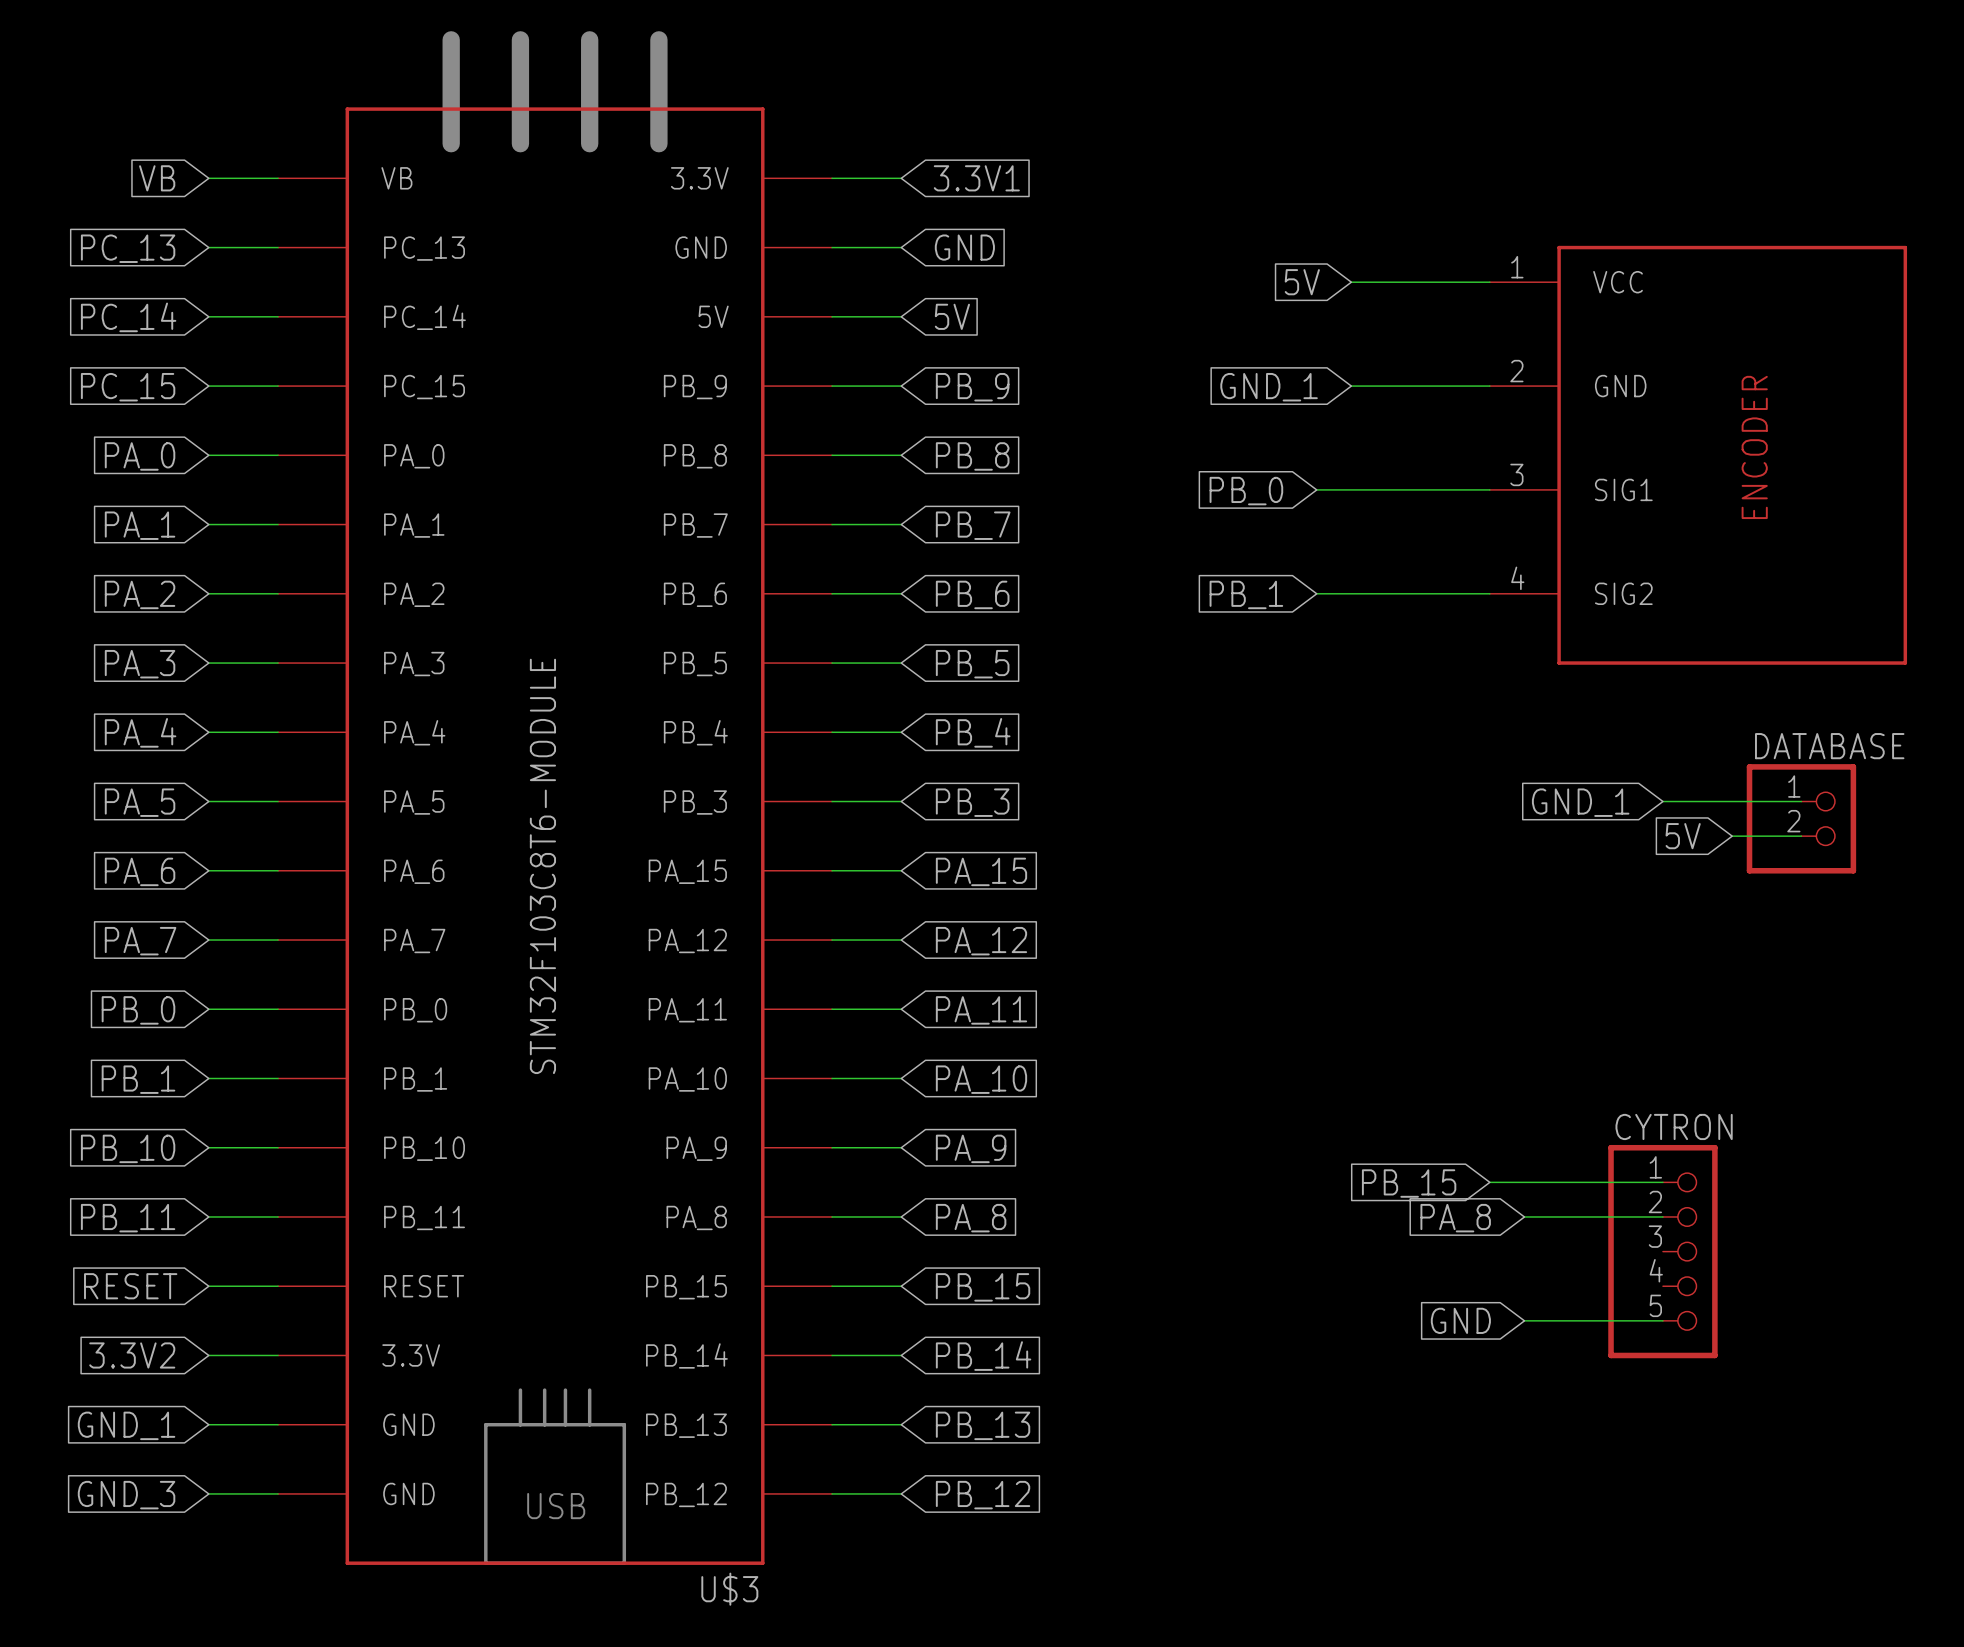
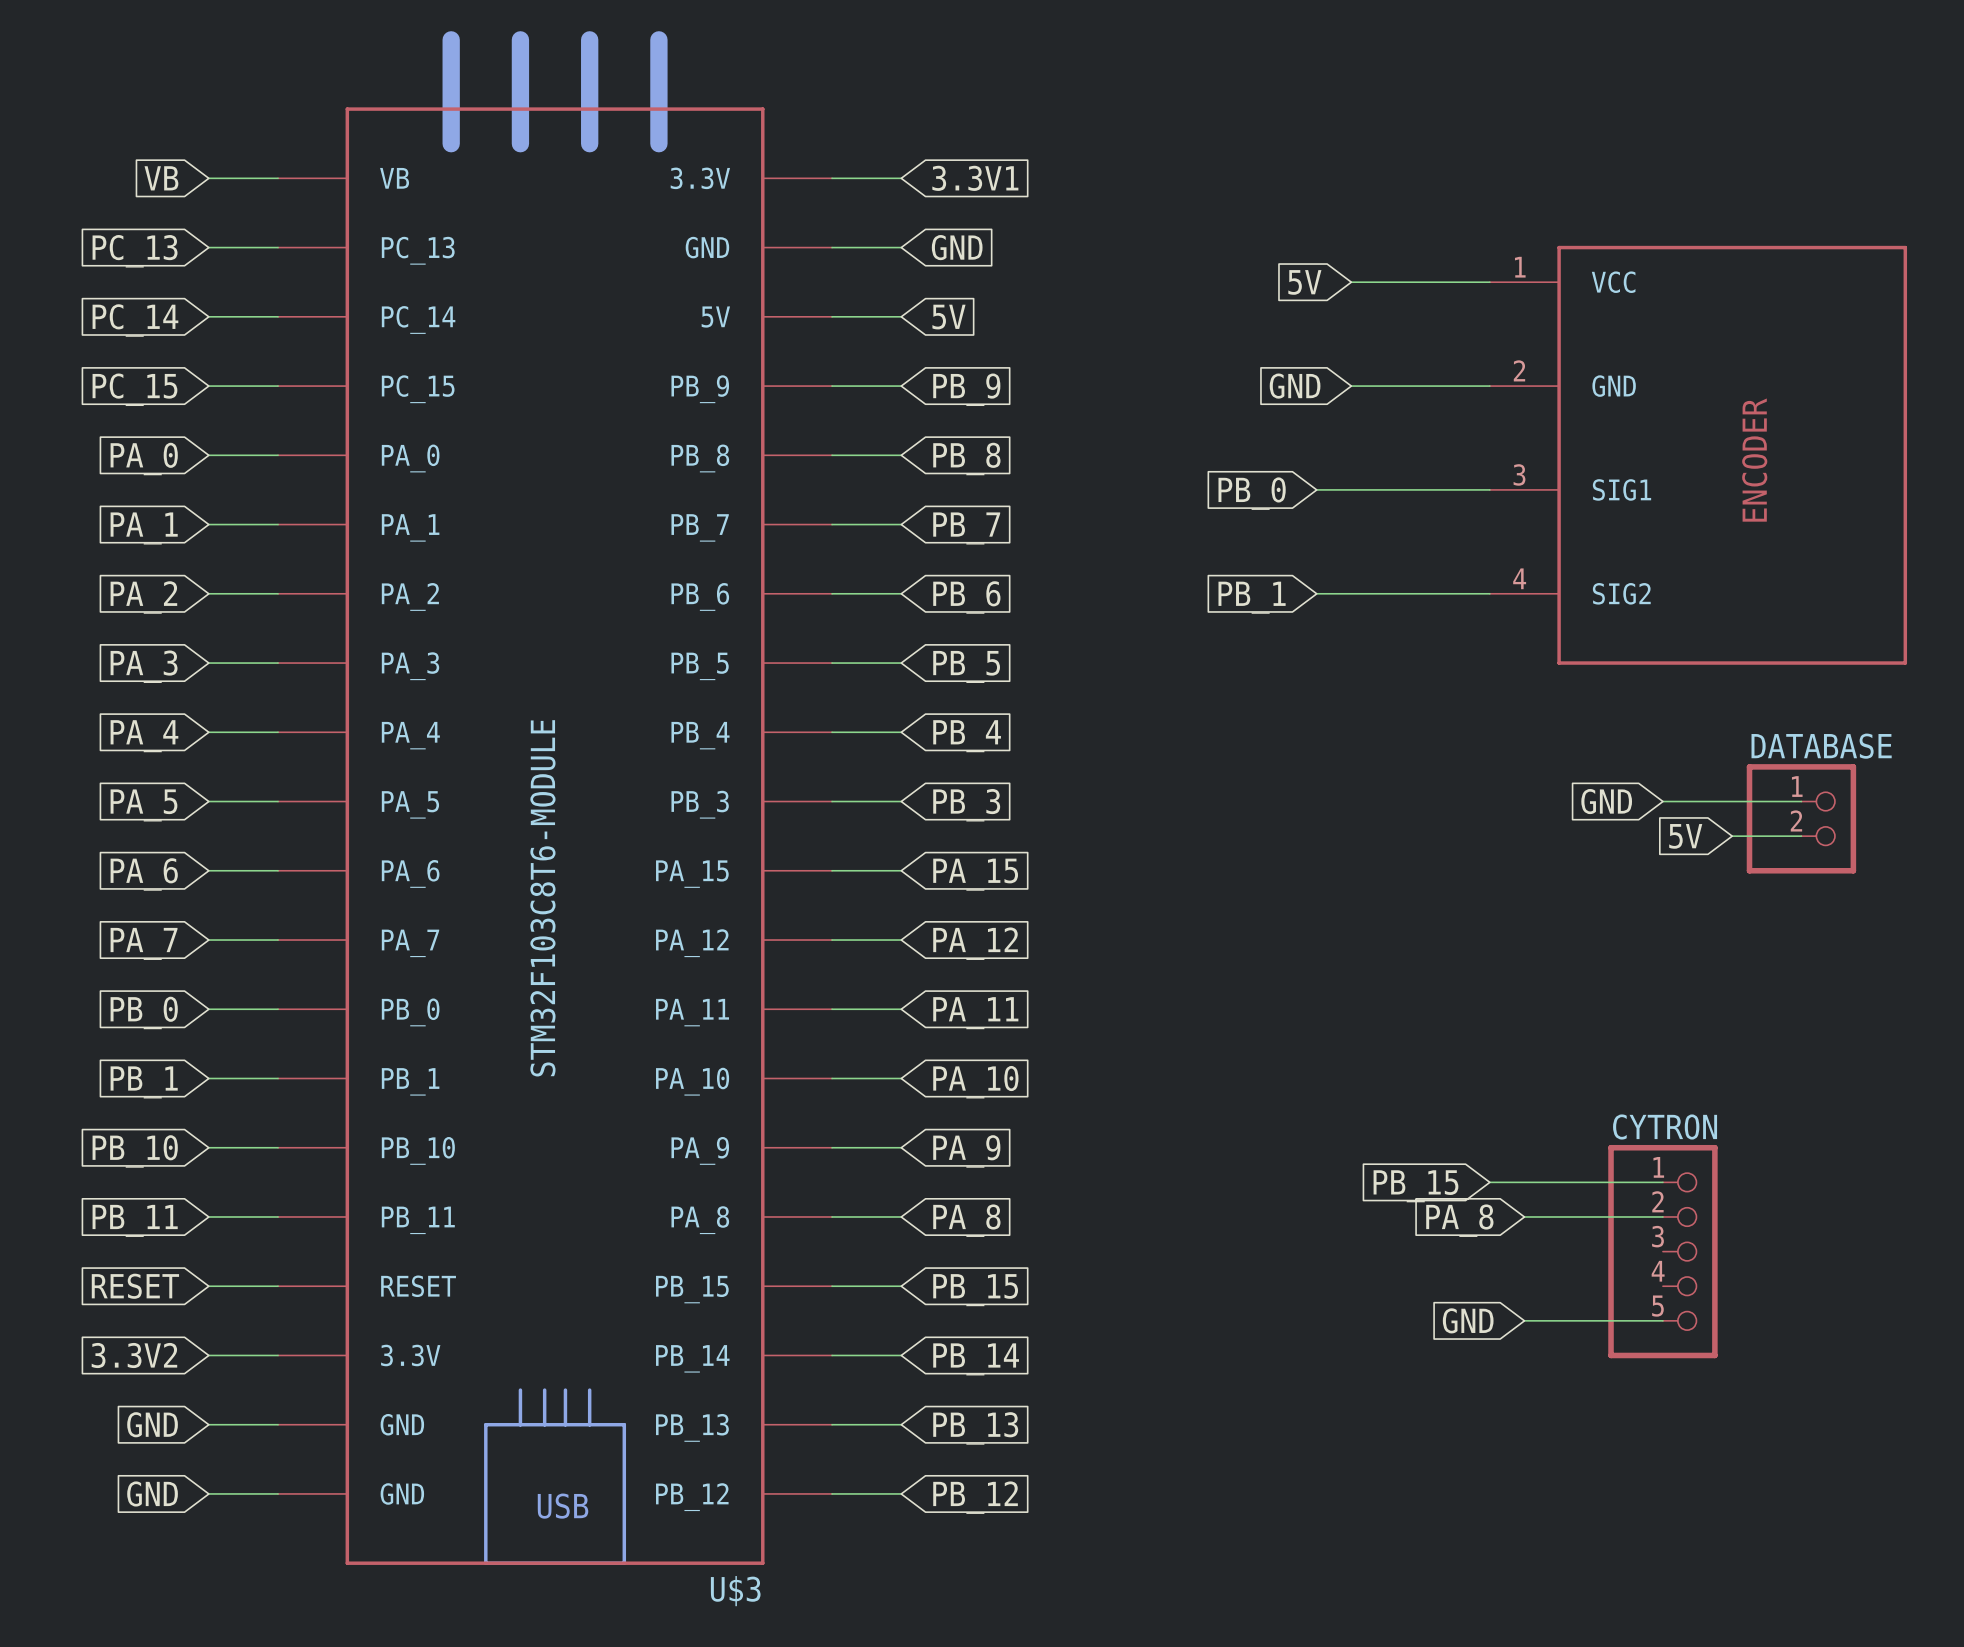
global label: GND_1 (1269, 387) -> GND (1295, 386)
global label: GND_1 (1580, 802) -> GND (1606, 801)
global label: GND_1 (126, 1425) -> GND (152, 1424)
global label: GND_3 (126, 1495) -> GND (152, 1493)

